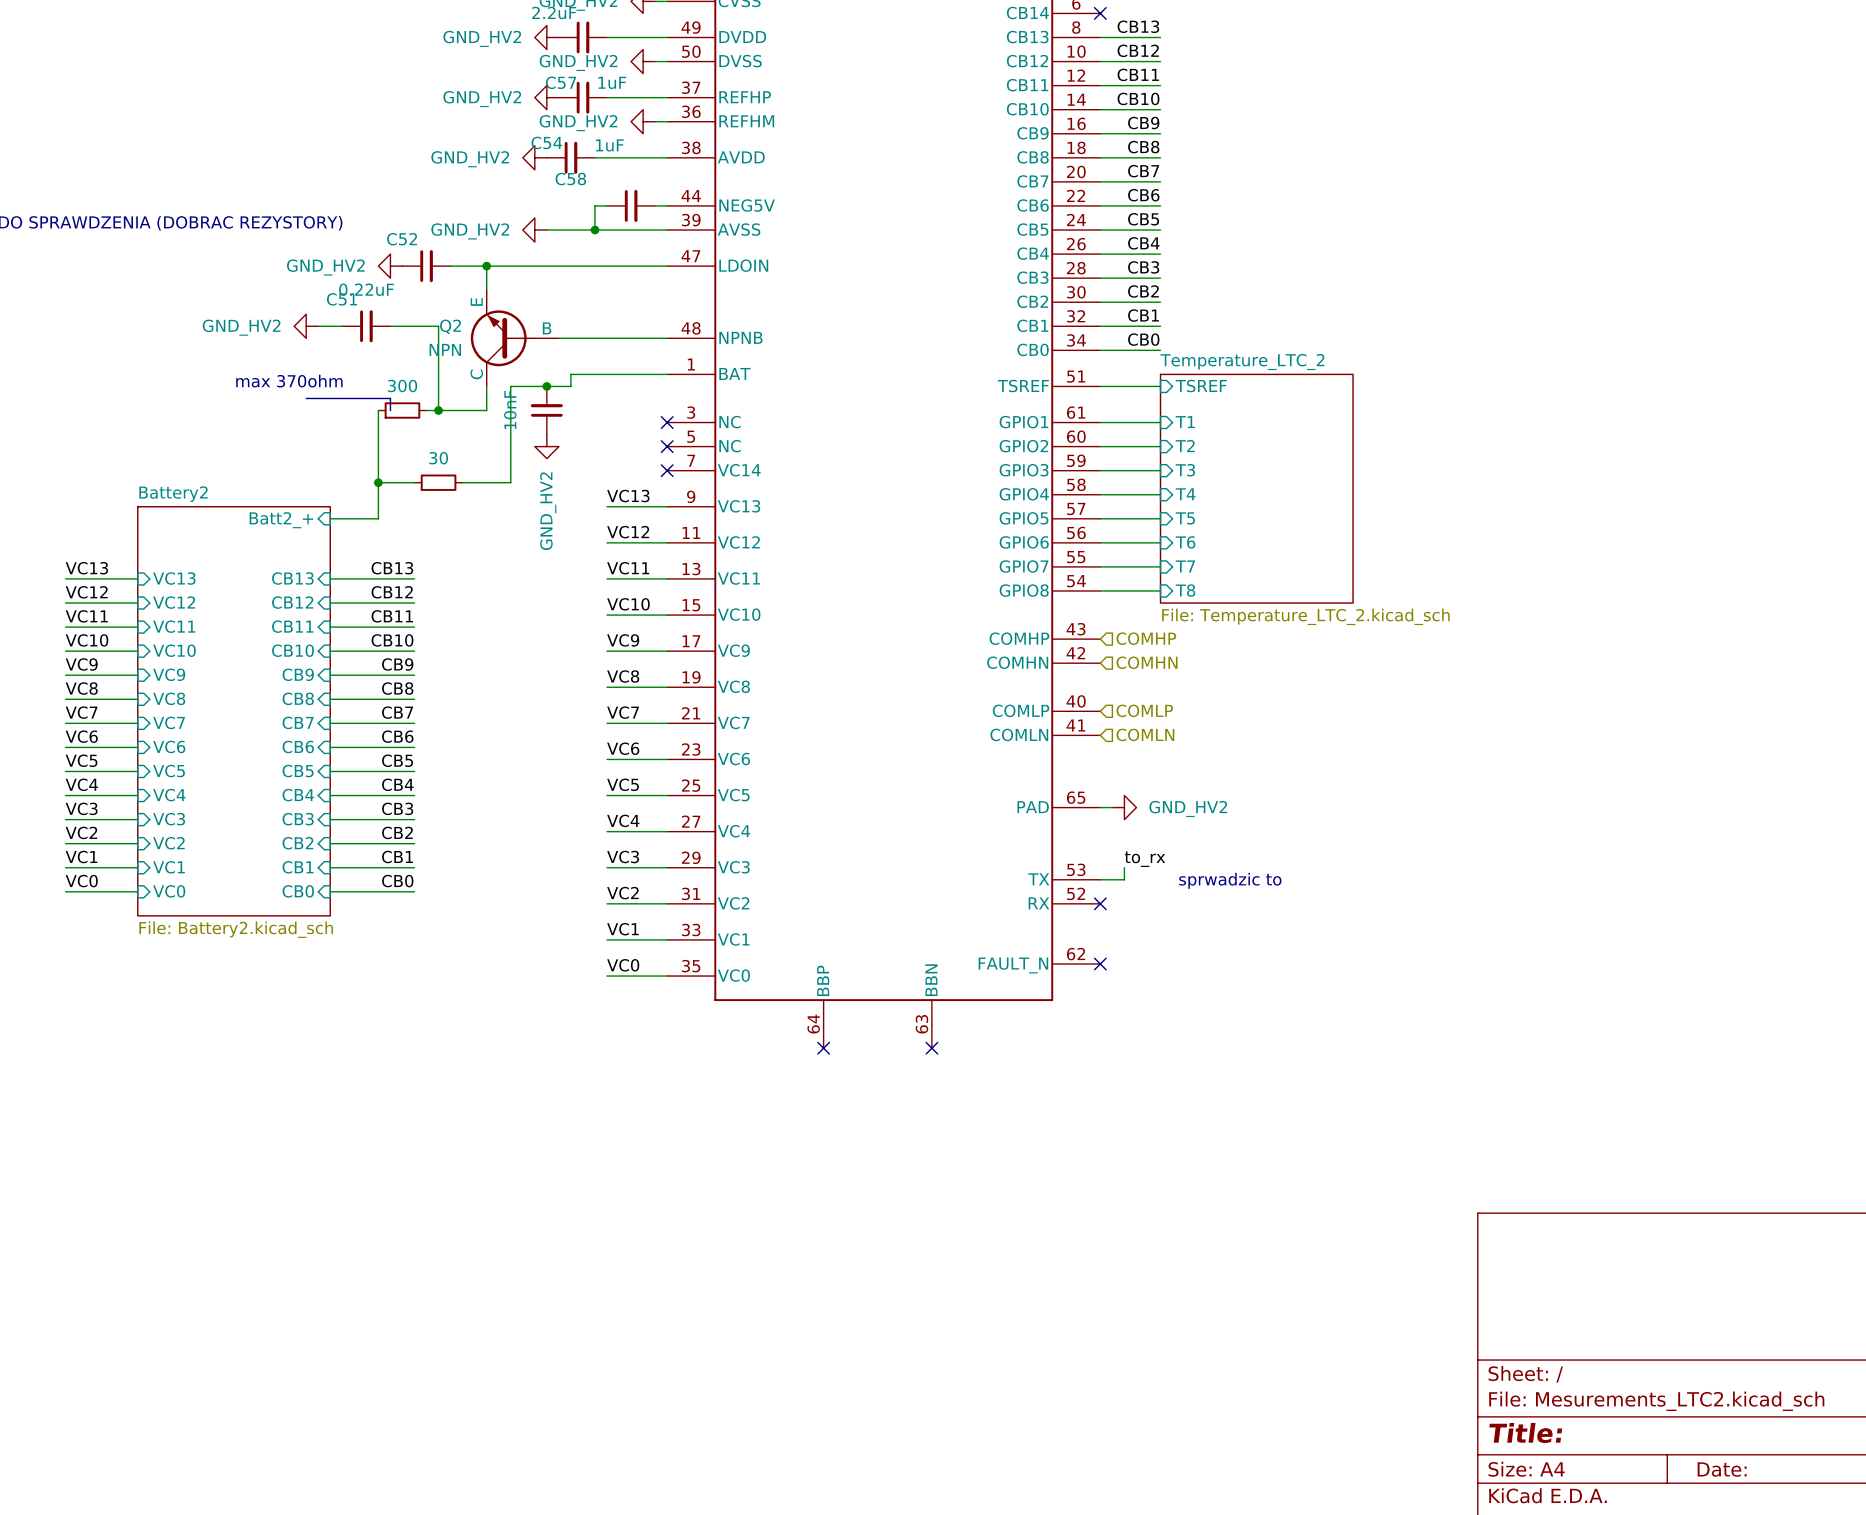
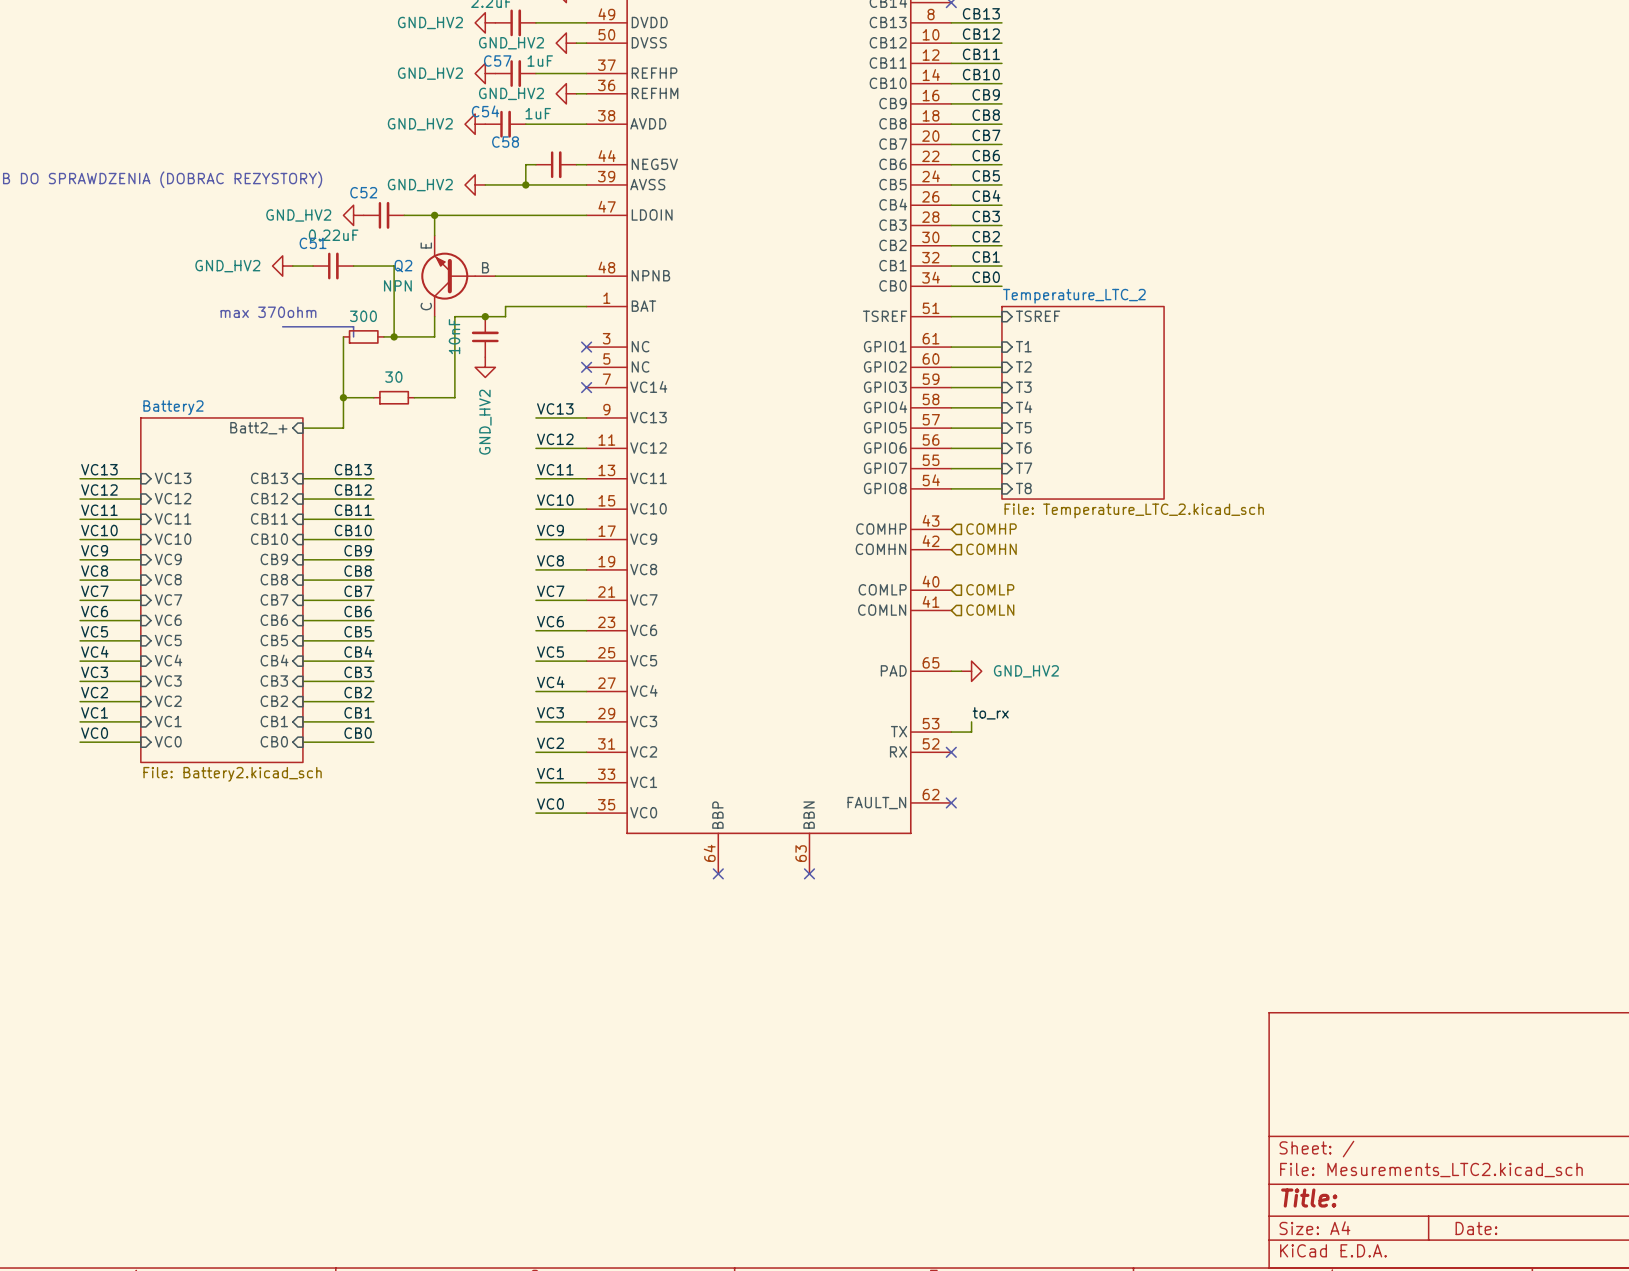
text: sprwadzic to (1230, 880) -> none

